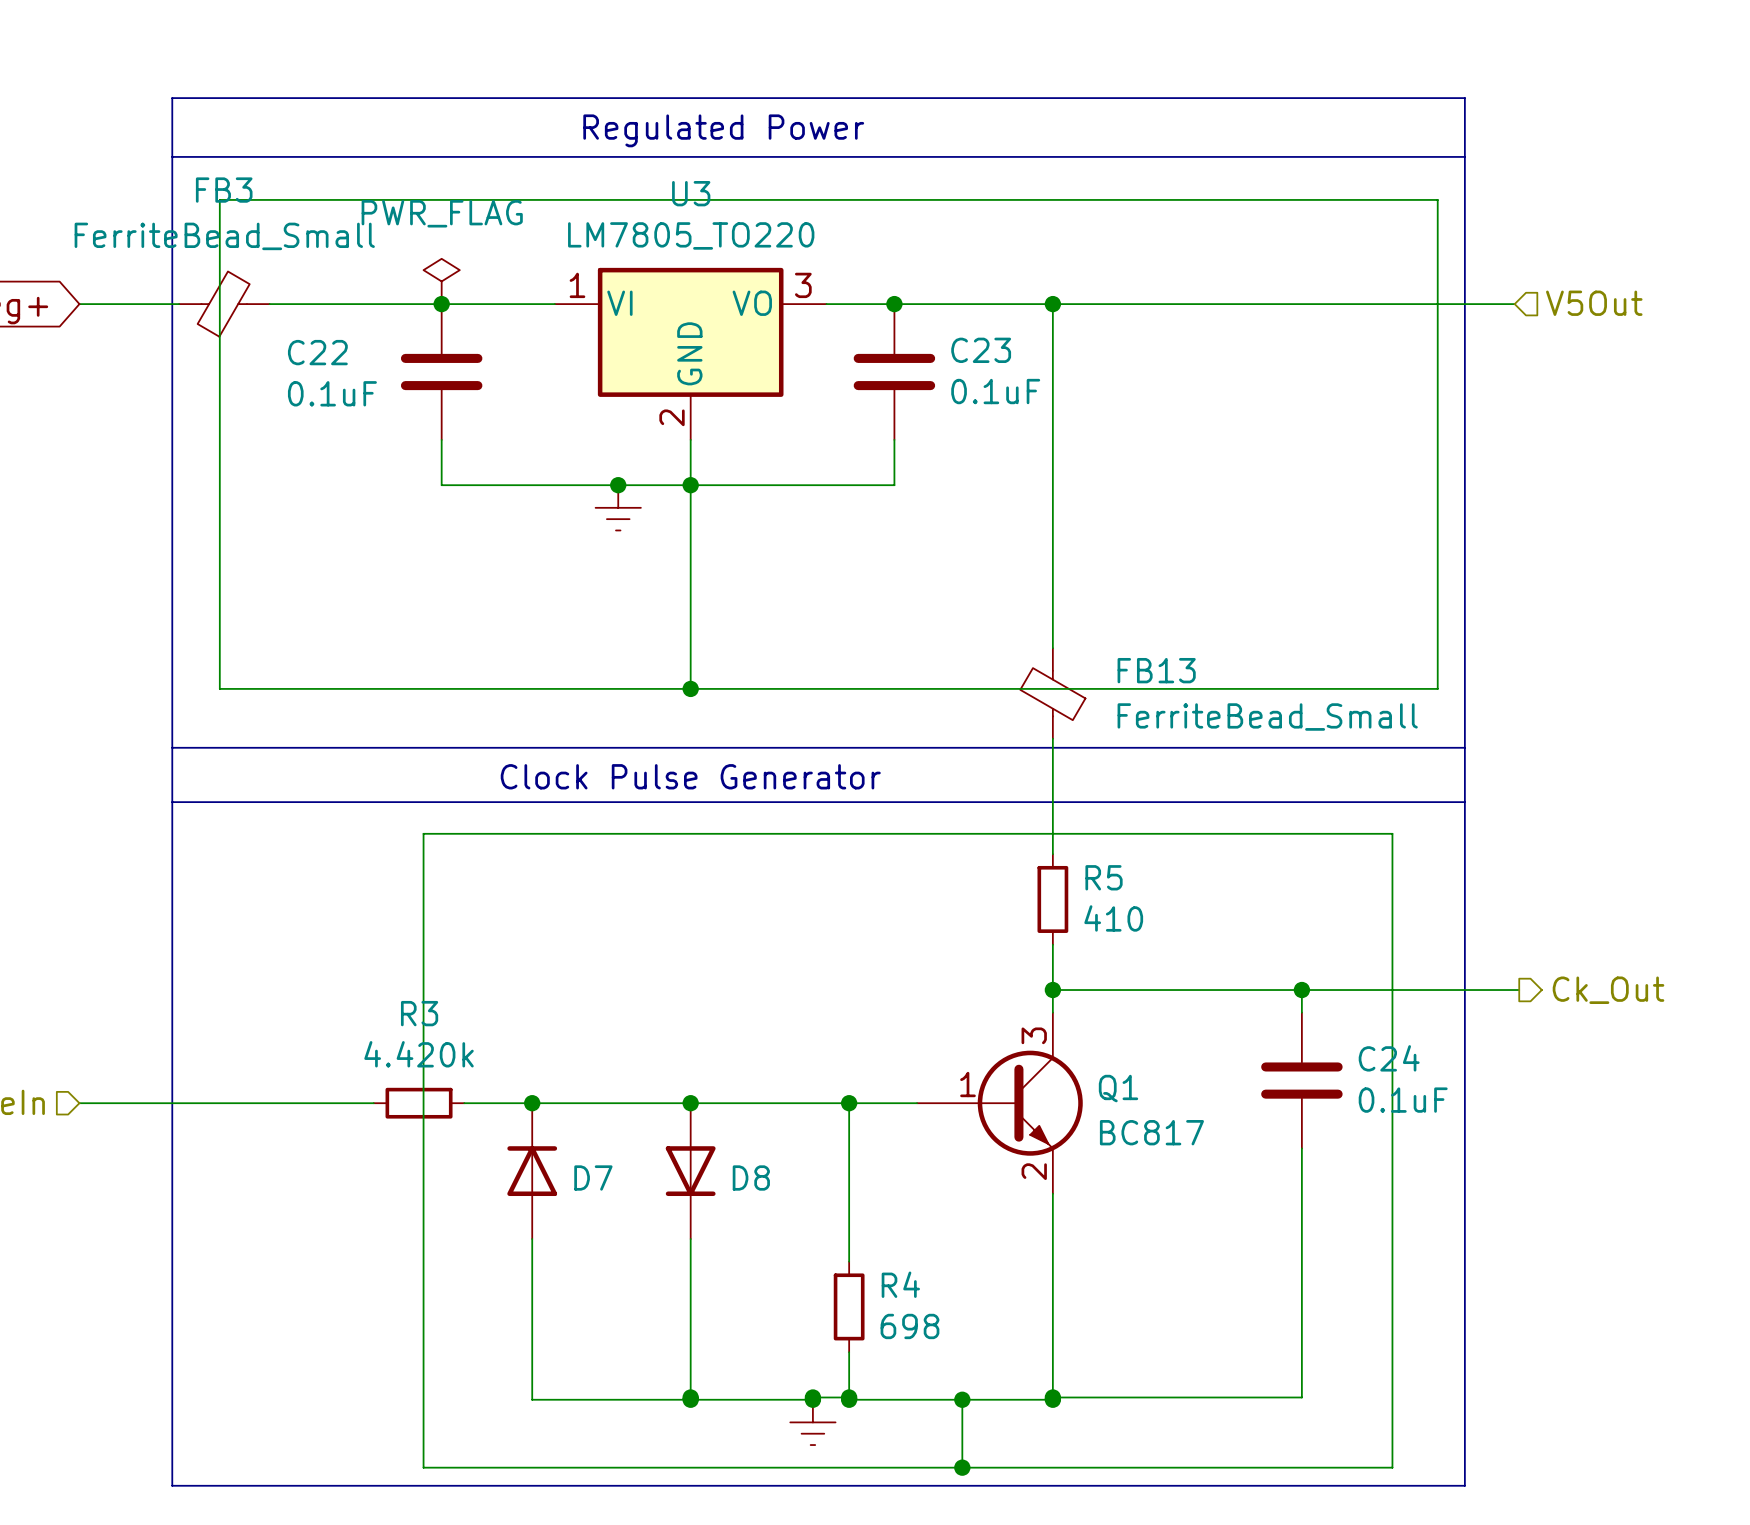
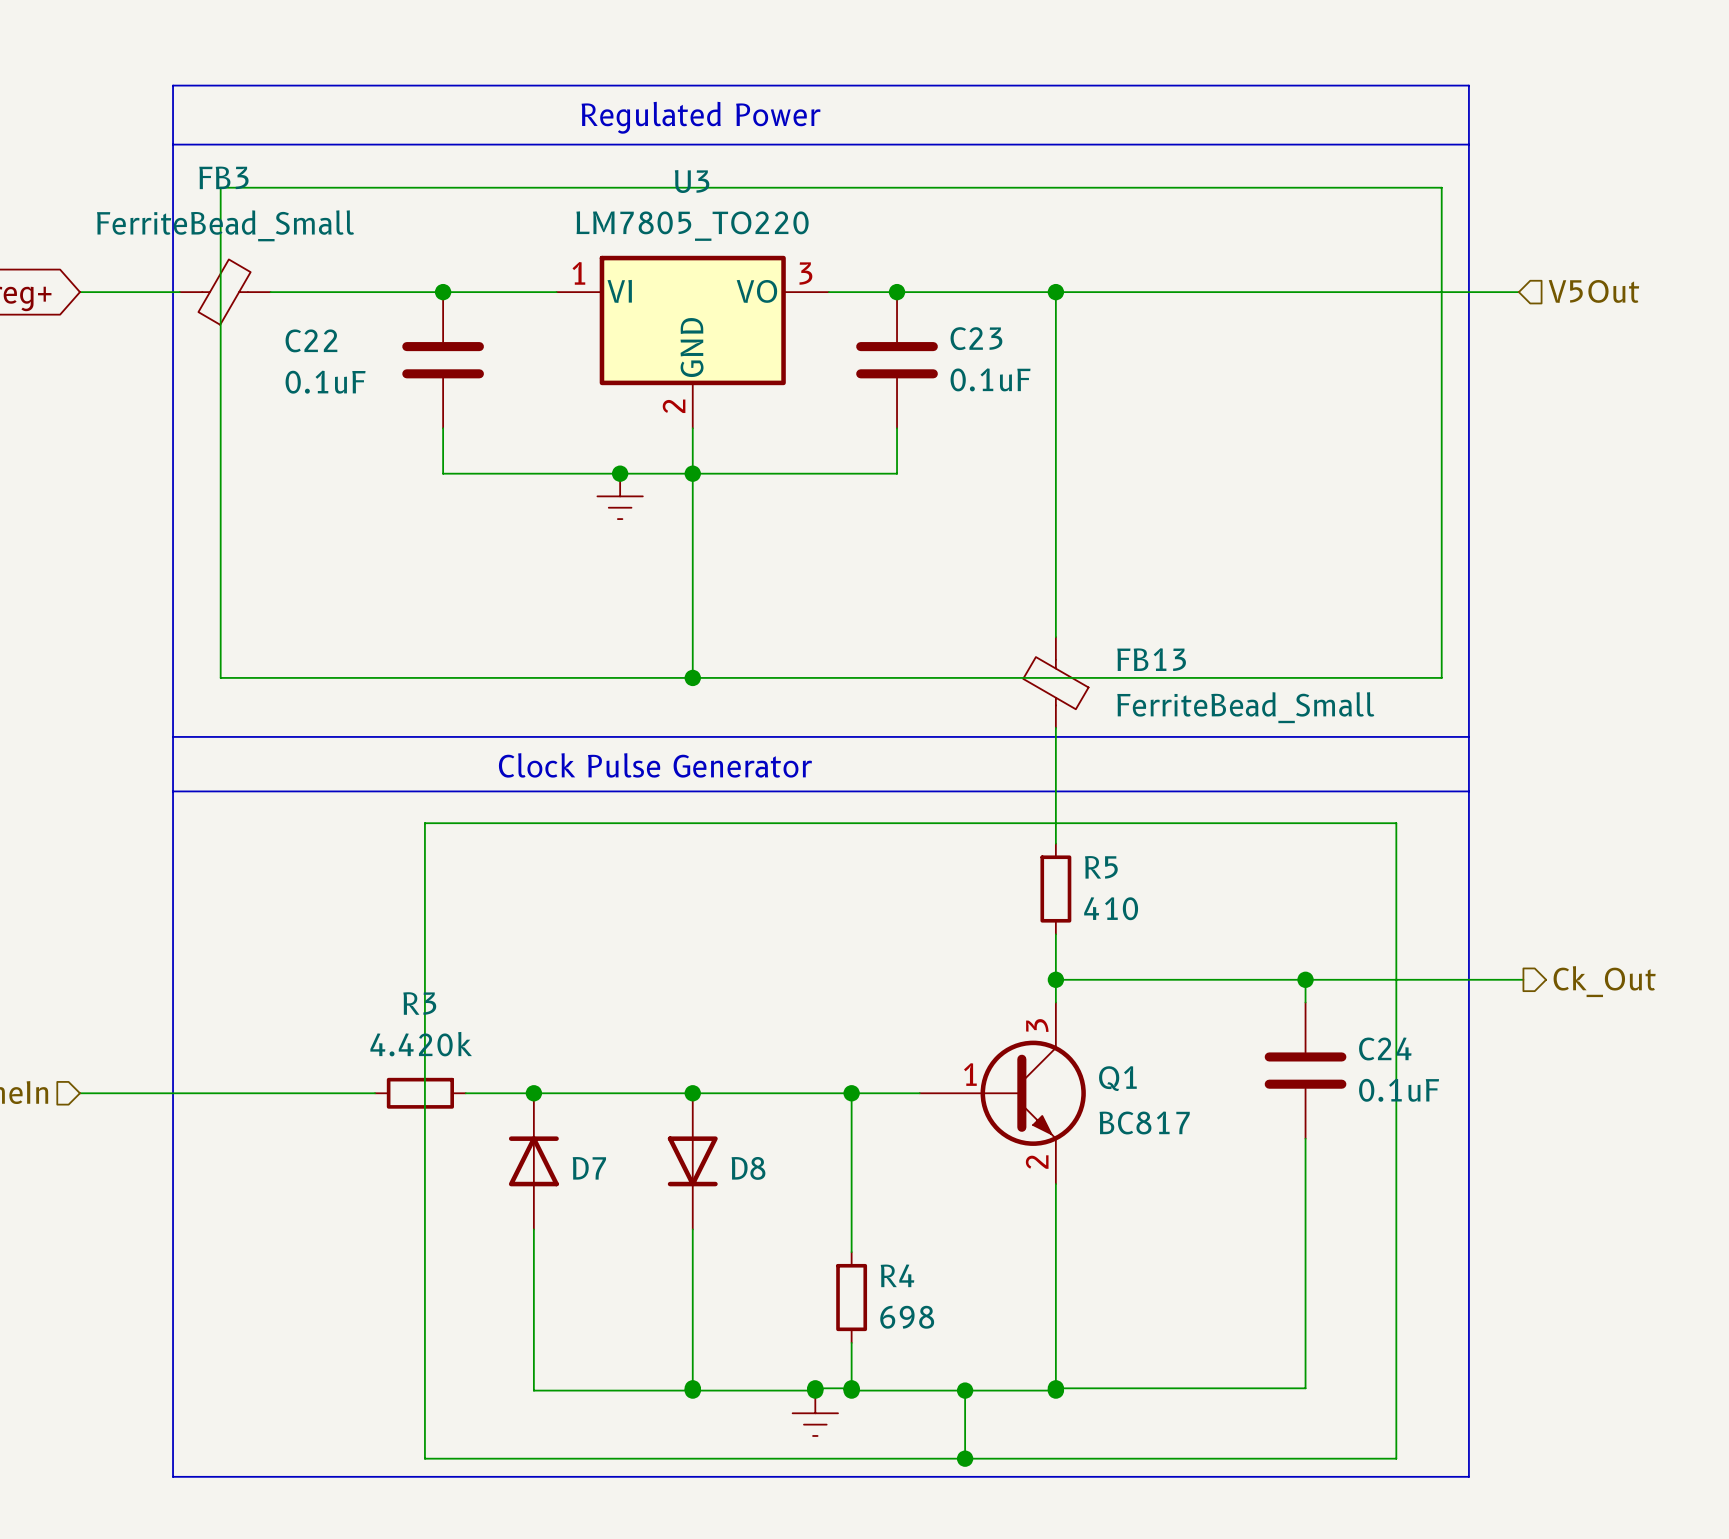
power symbol: PWR_FLAG (441, 281) -> none

